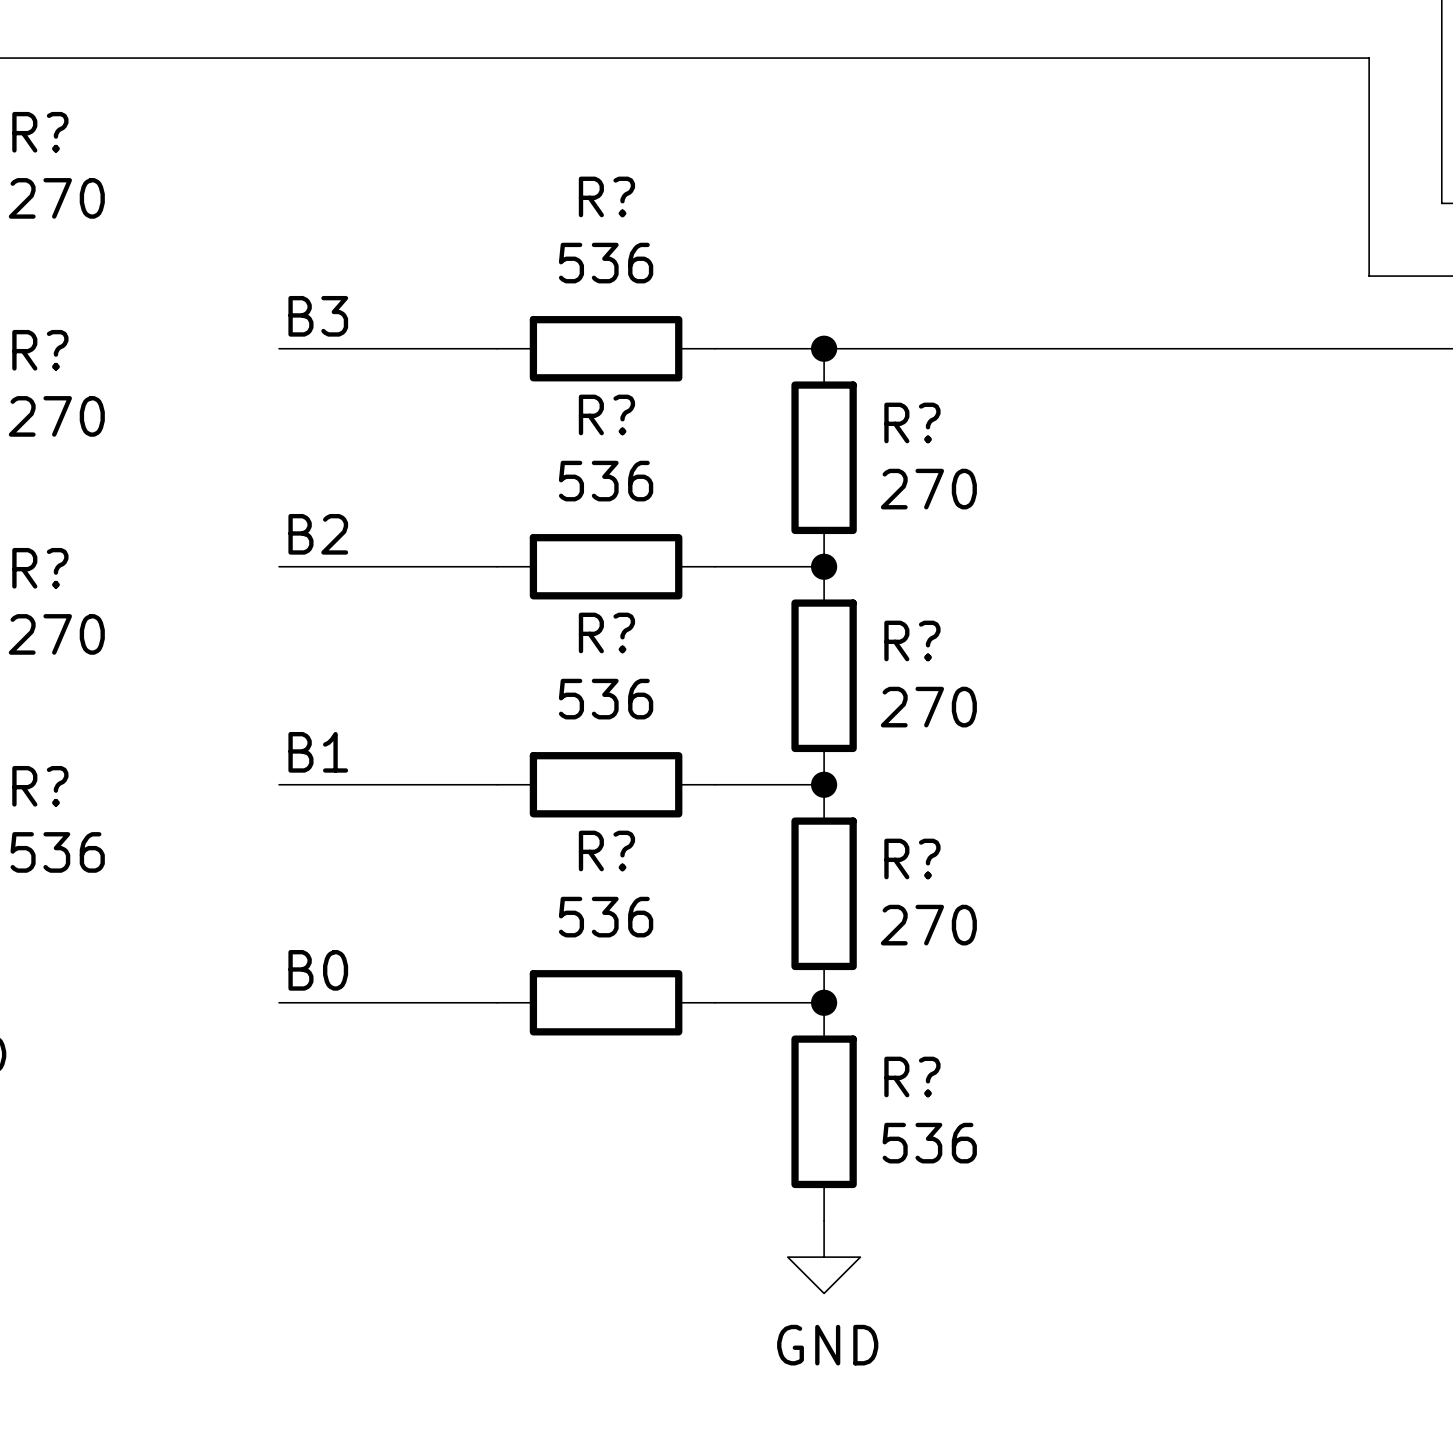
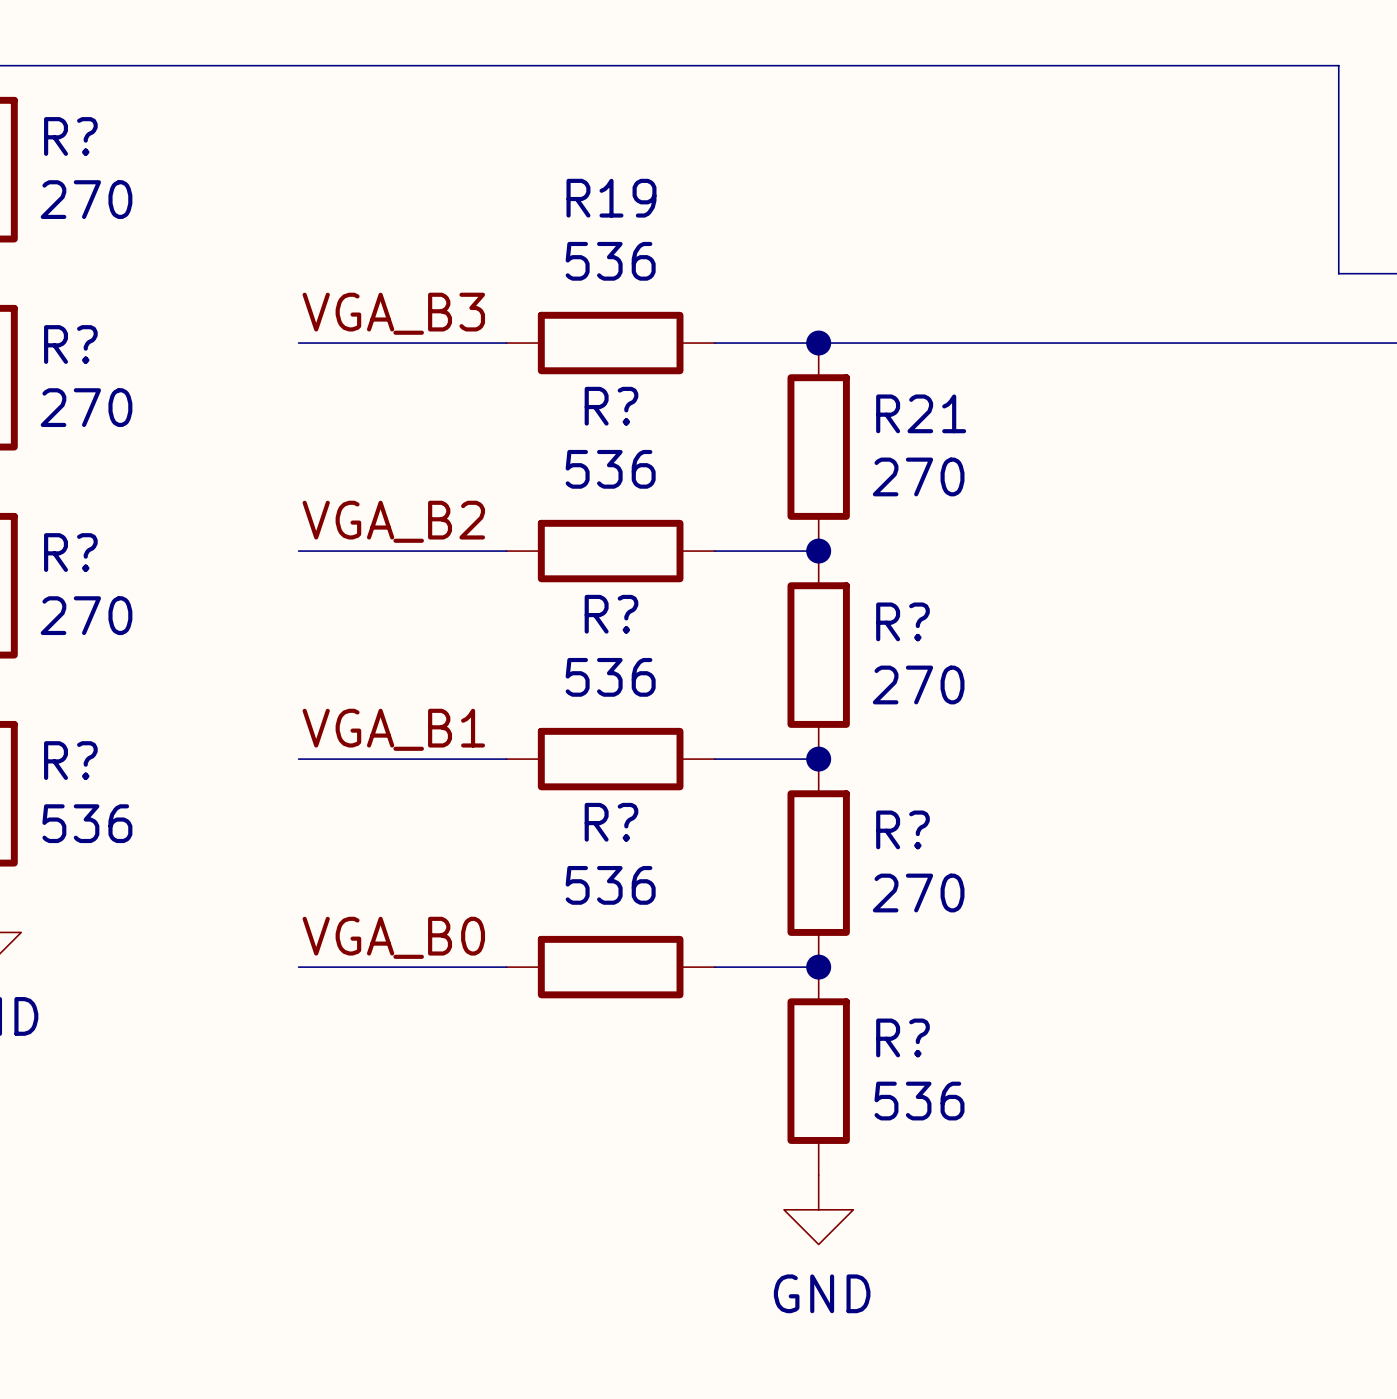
R? name: R? (606, 196) -> R19 (611, 198)
label: B3 (318, 316) -> VGA_B3 (393, 313)
R? name: R? (912, 422) -> R21 (921, 413)
label: B2 (318, 534) -> VGA_B2 (393, 521)
label: B1 (318, 752) -> VGA_B1 (393, 729)
label: B0 (318, 970) -> VGA_B0 (393, 937)

